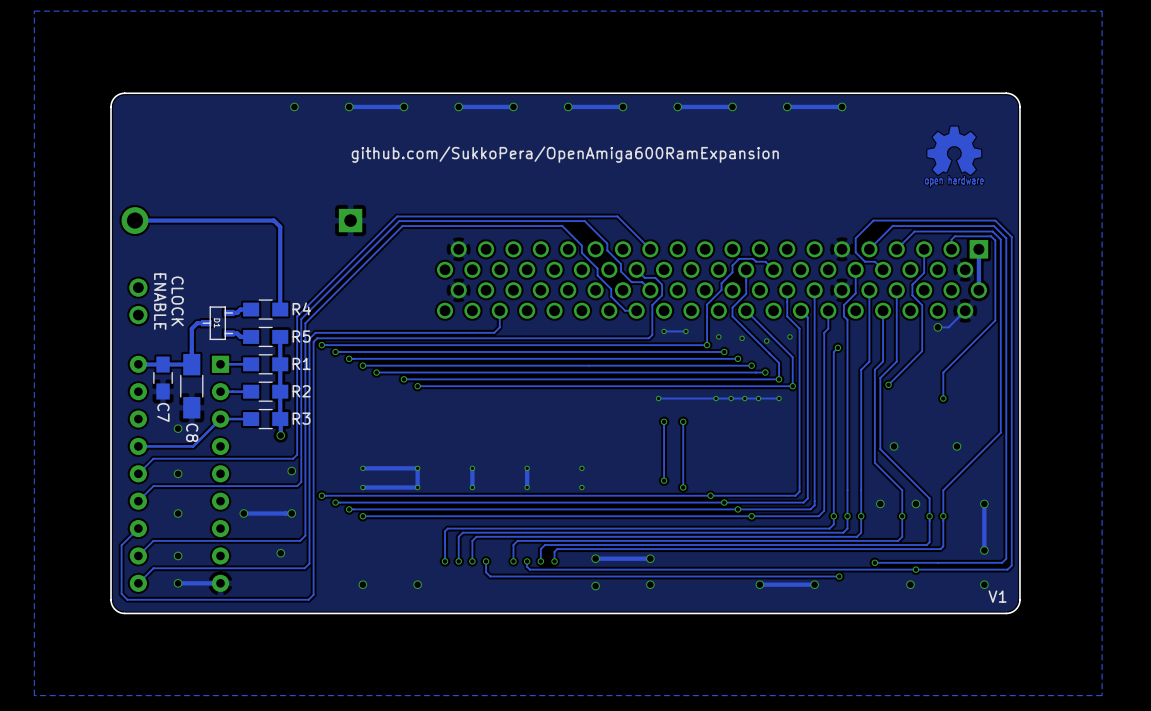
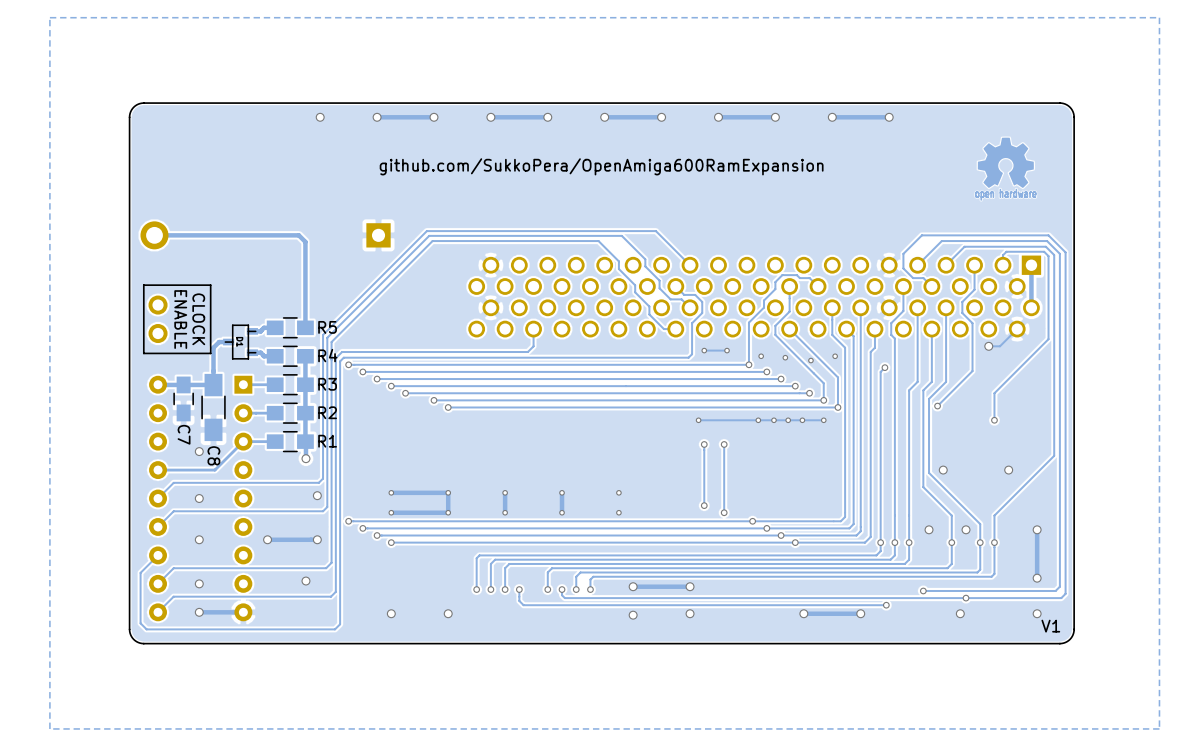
line: none -> (210, 285) (143, 285) (143, 353) (210, 353) (210, 285)
R4 name: R4 (301, 308) -> R5 (327, 327)
R5 name: R5 (301, 336) -> R4 (327, 355)
R1 name: R1 (301, 363) -> R3 (327, 384)
R3 name: R3 (301, 418) -> R1 (327, 441)

